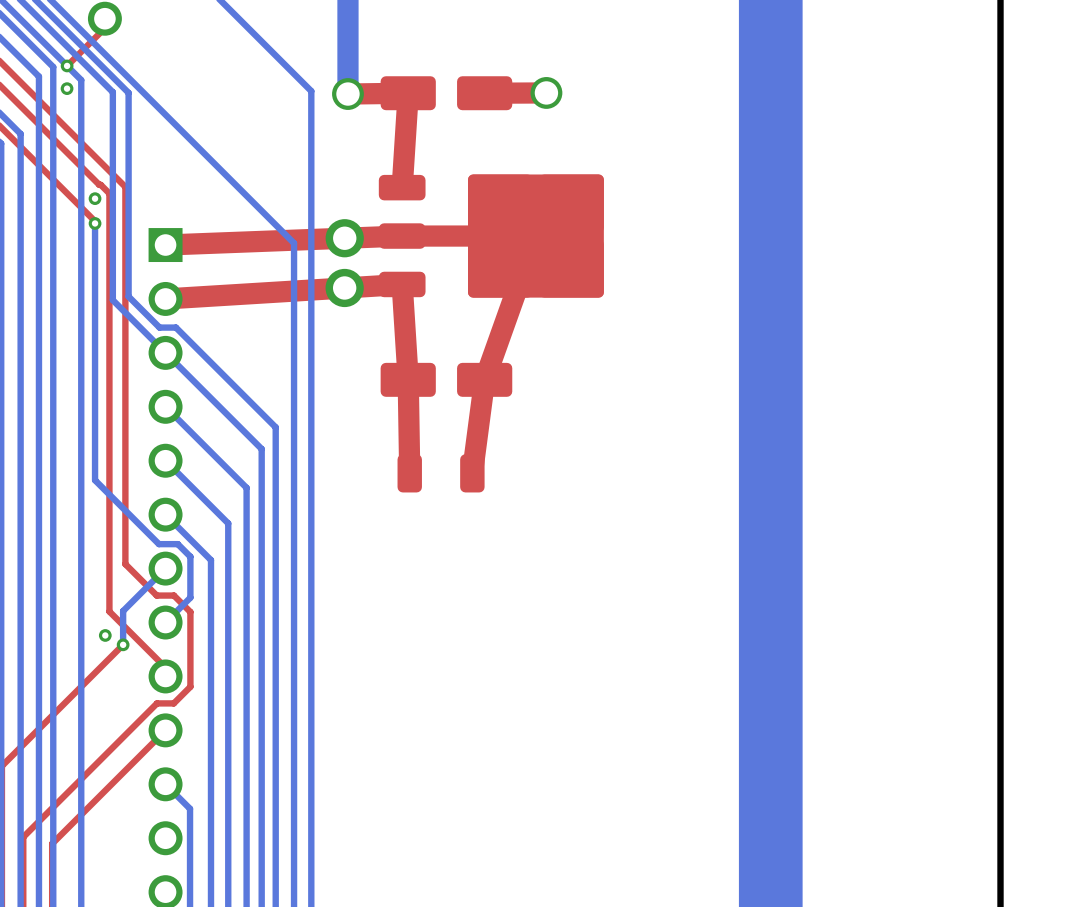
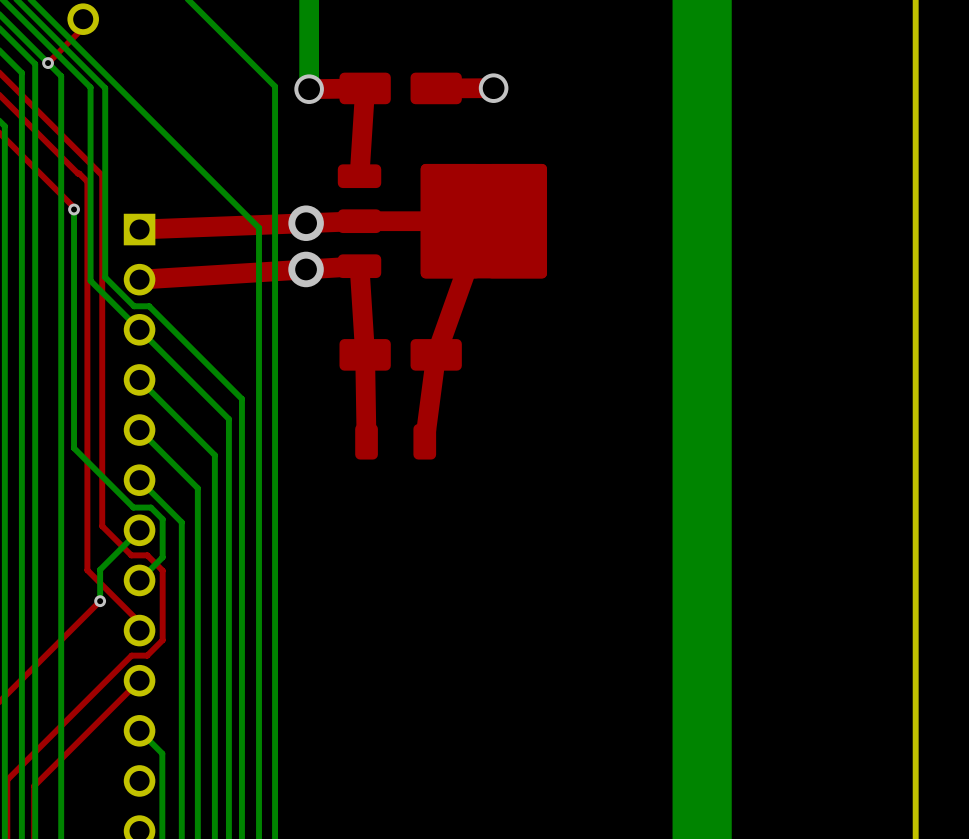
via: (67, 88) -> none
via: (95, 198) -> none
via: (105, 635) -> none

